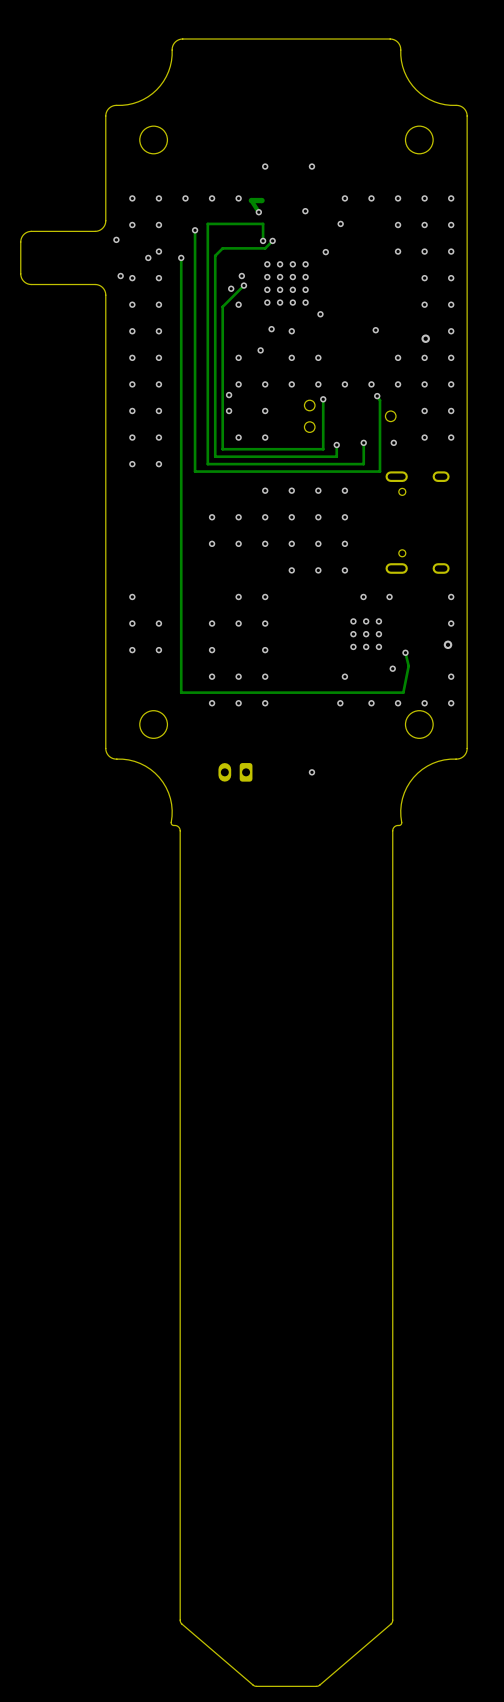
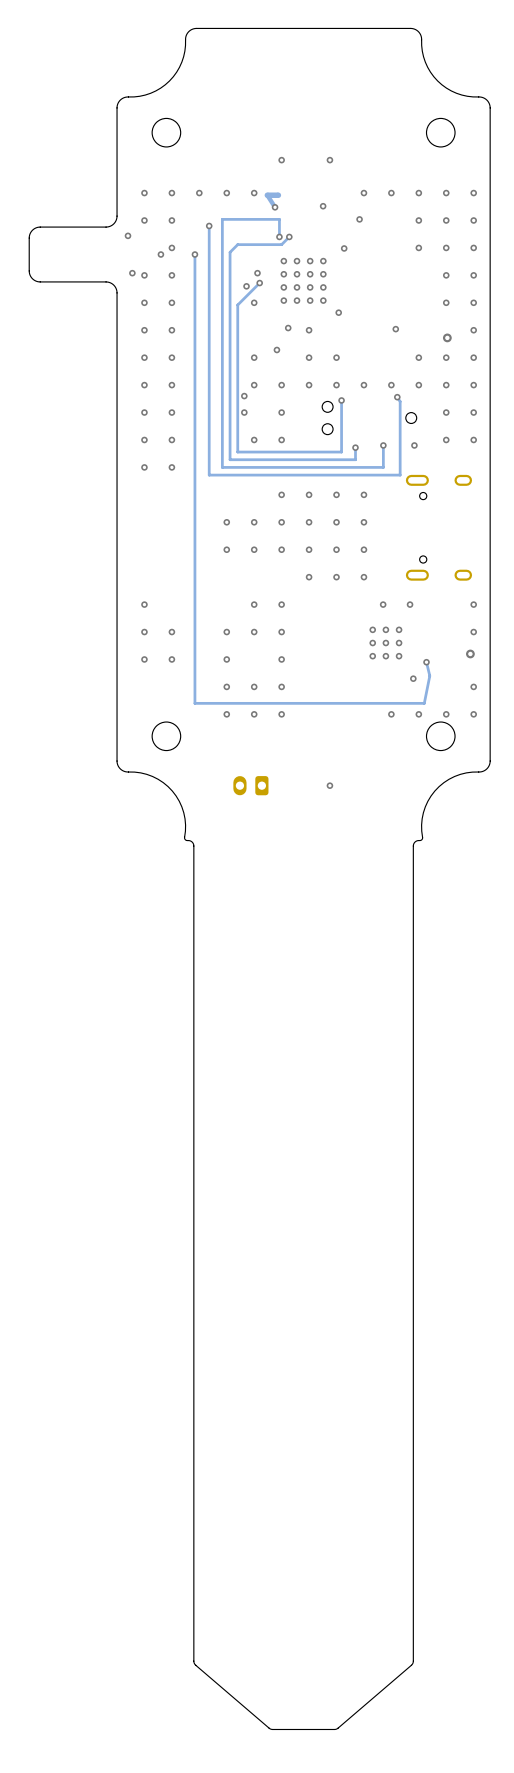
via: (344, 676) -> none
via: (340, 703) -> none

